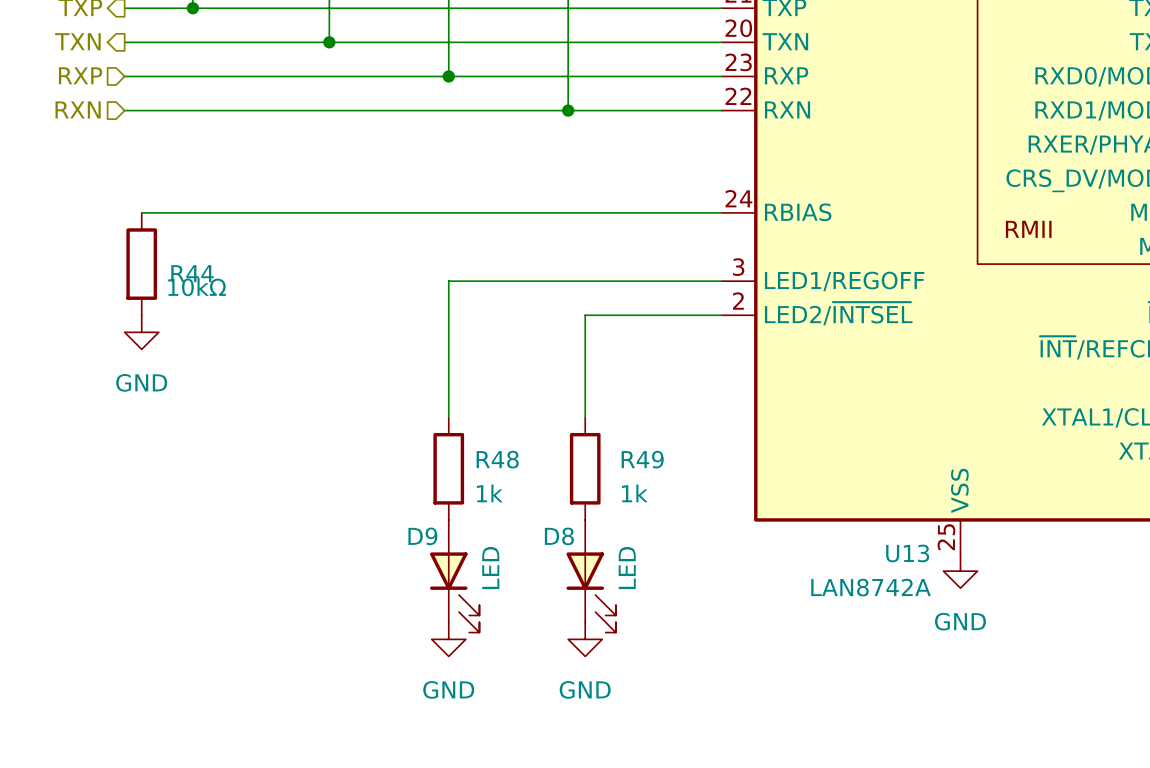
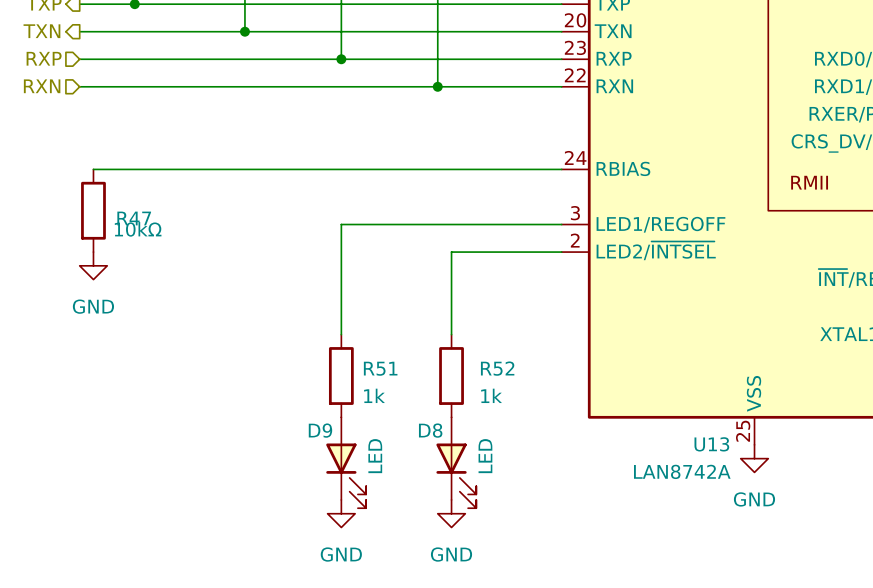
R44 name: R44 (192, 273) -> R47 (134, 218)
R48 name: R48 (497, 459) -> R51 (380, 368)
R49 name: R49 (642, 459) -> R52 (497, 368)

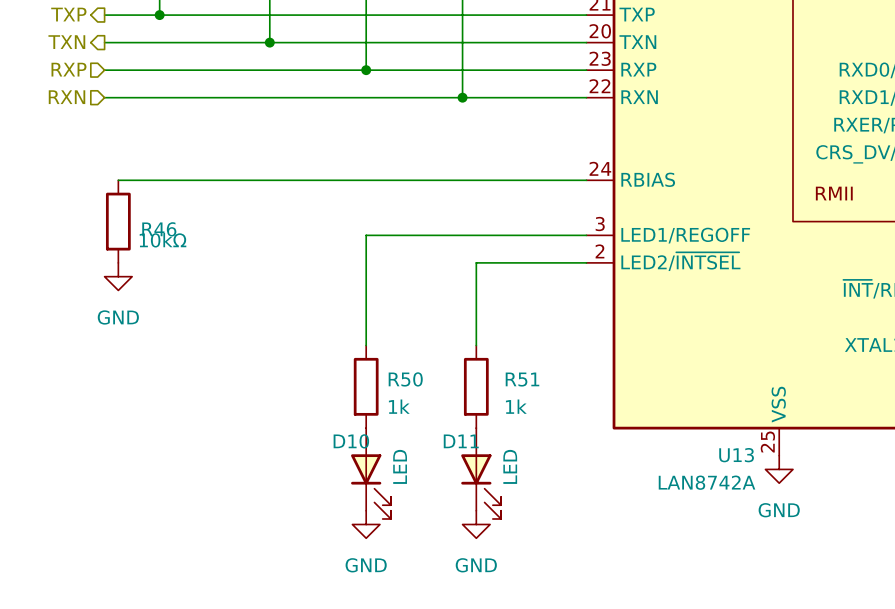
R47 name: R47 (134, 218) -> R46 (159, 229)
R51 name: R51 (380, 368) -> R50 (405, 379)
R52 name: R52 (497, 368) -> R51 (522, 379)
D9 name: D9 (320, 430) -> D10 (351, 441)
D8 name: D8 (430, 430) -> D11 (461, 441)

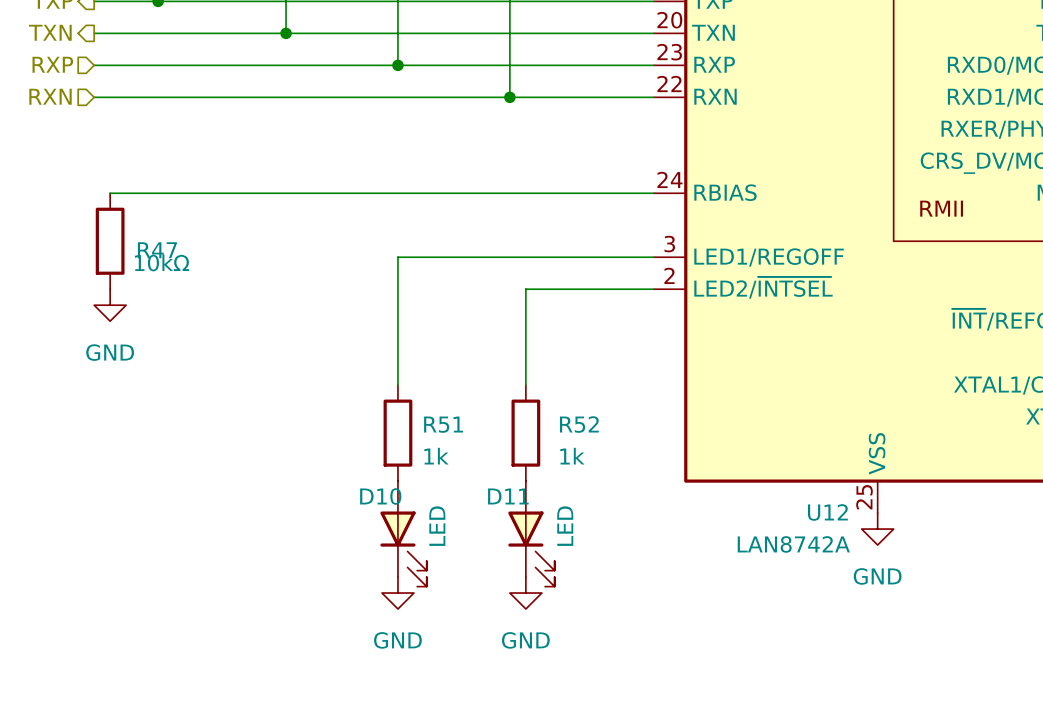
R46 name: R46 (159, 229) -> R47 (157, 250)
R50 name: R50 (405, 379) -> R51 (443, 424)
R51 name: R51 (522, 379) -> R52 (579, 424)
U13 name: U13 (736, 455) -> U12 (827, 512)

